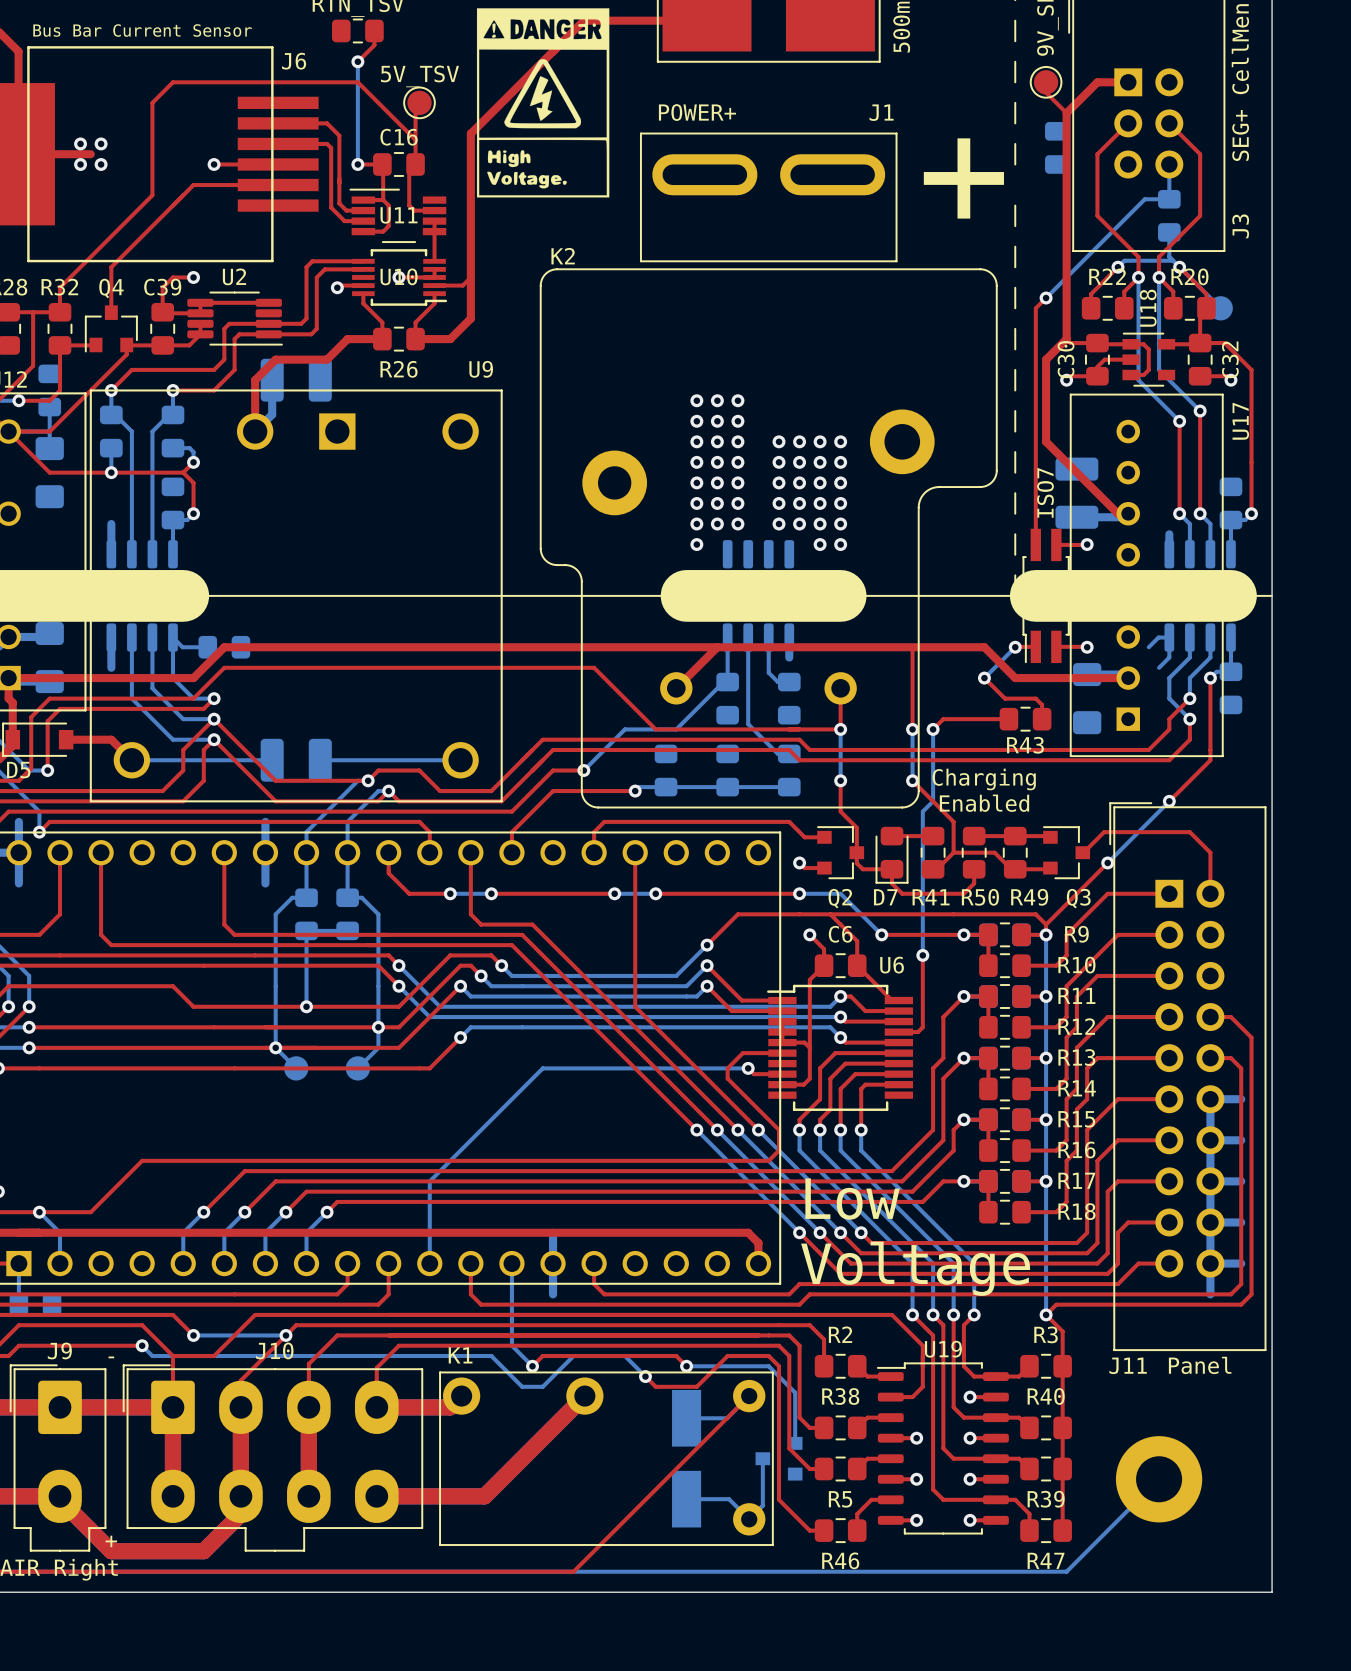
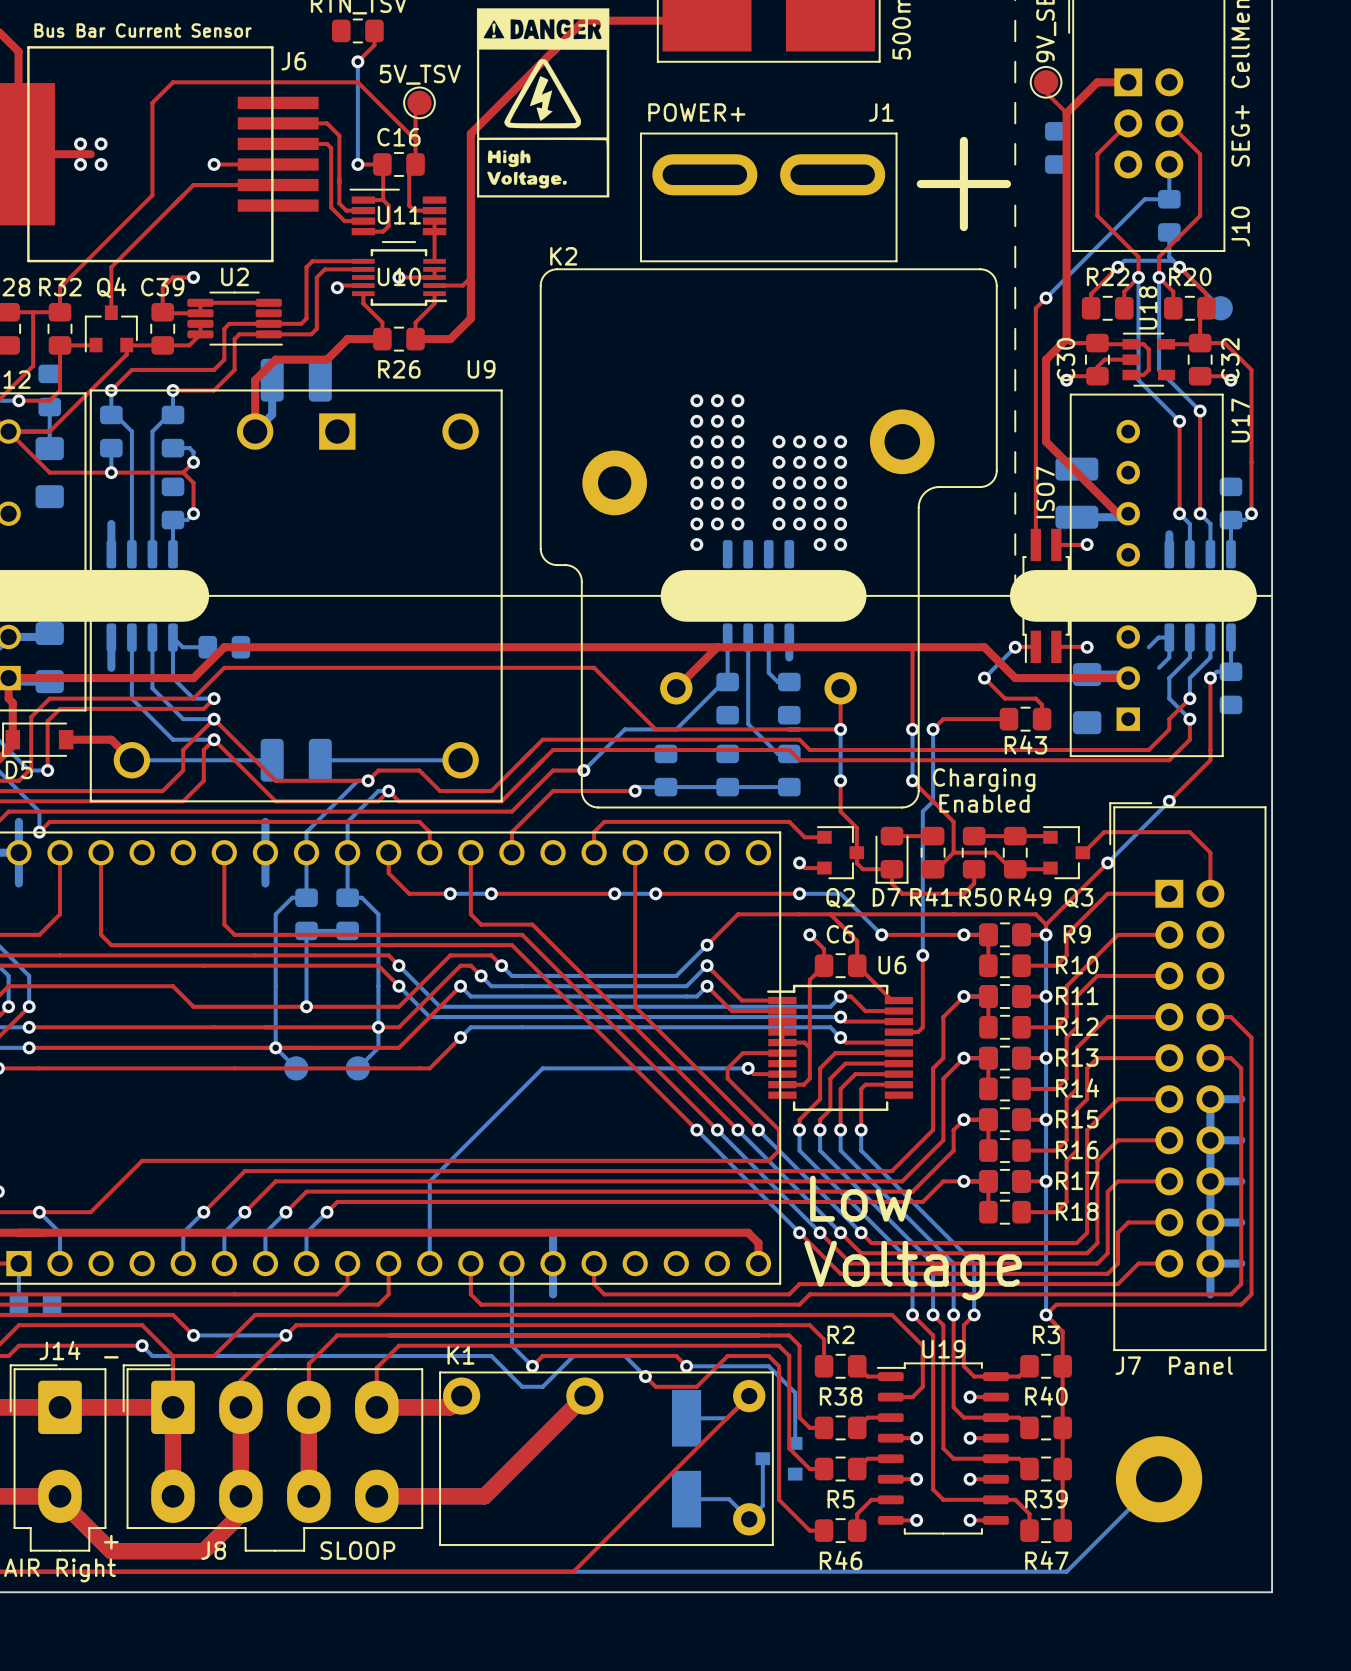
J3 name: J3 (1240, 226) -> J10 (1240, 226)
J9 name: J9 (59, 1350) -> J14 (60, 1350)
J10 name: J10 (274, 1350) -> J8 (213, 1550)
J11 name: J11 (1128, 1365) -> J7 (1128, 1365)
J10 value: none -> SLOOP (357, 1550)

